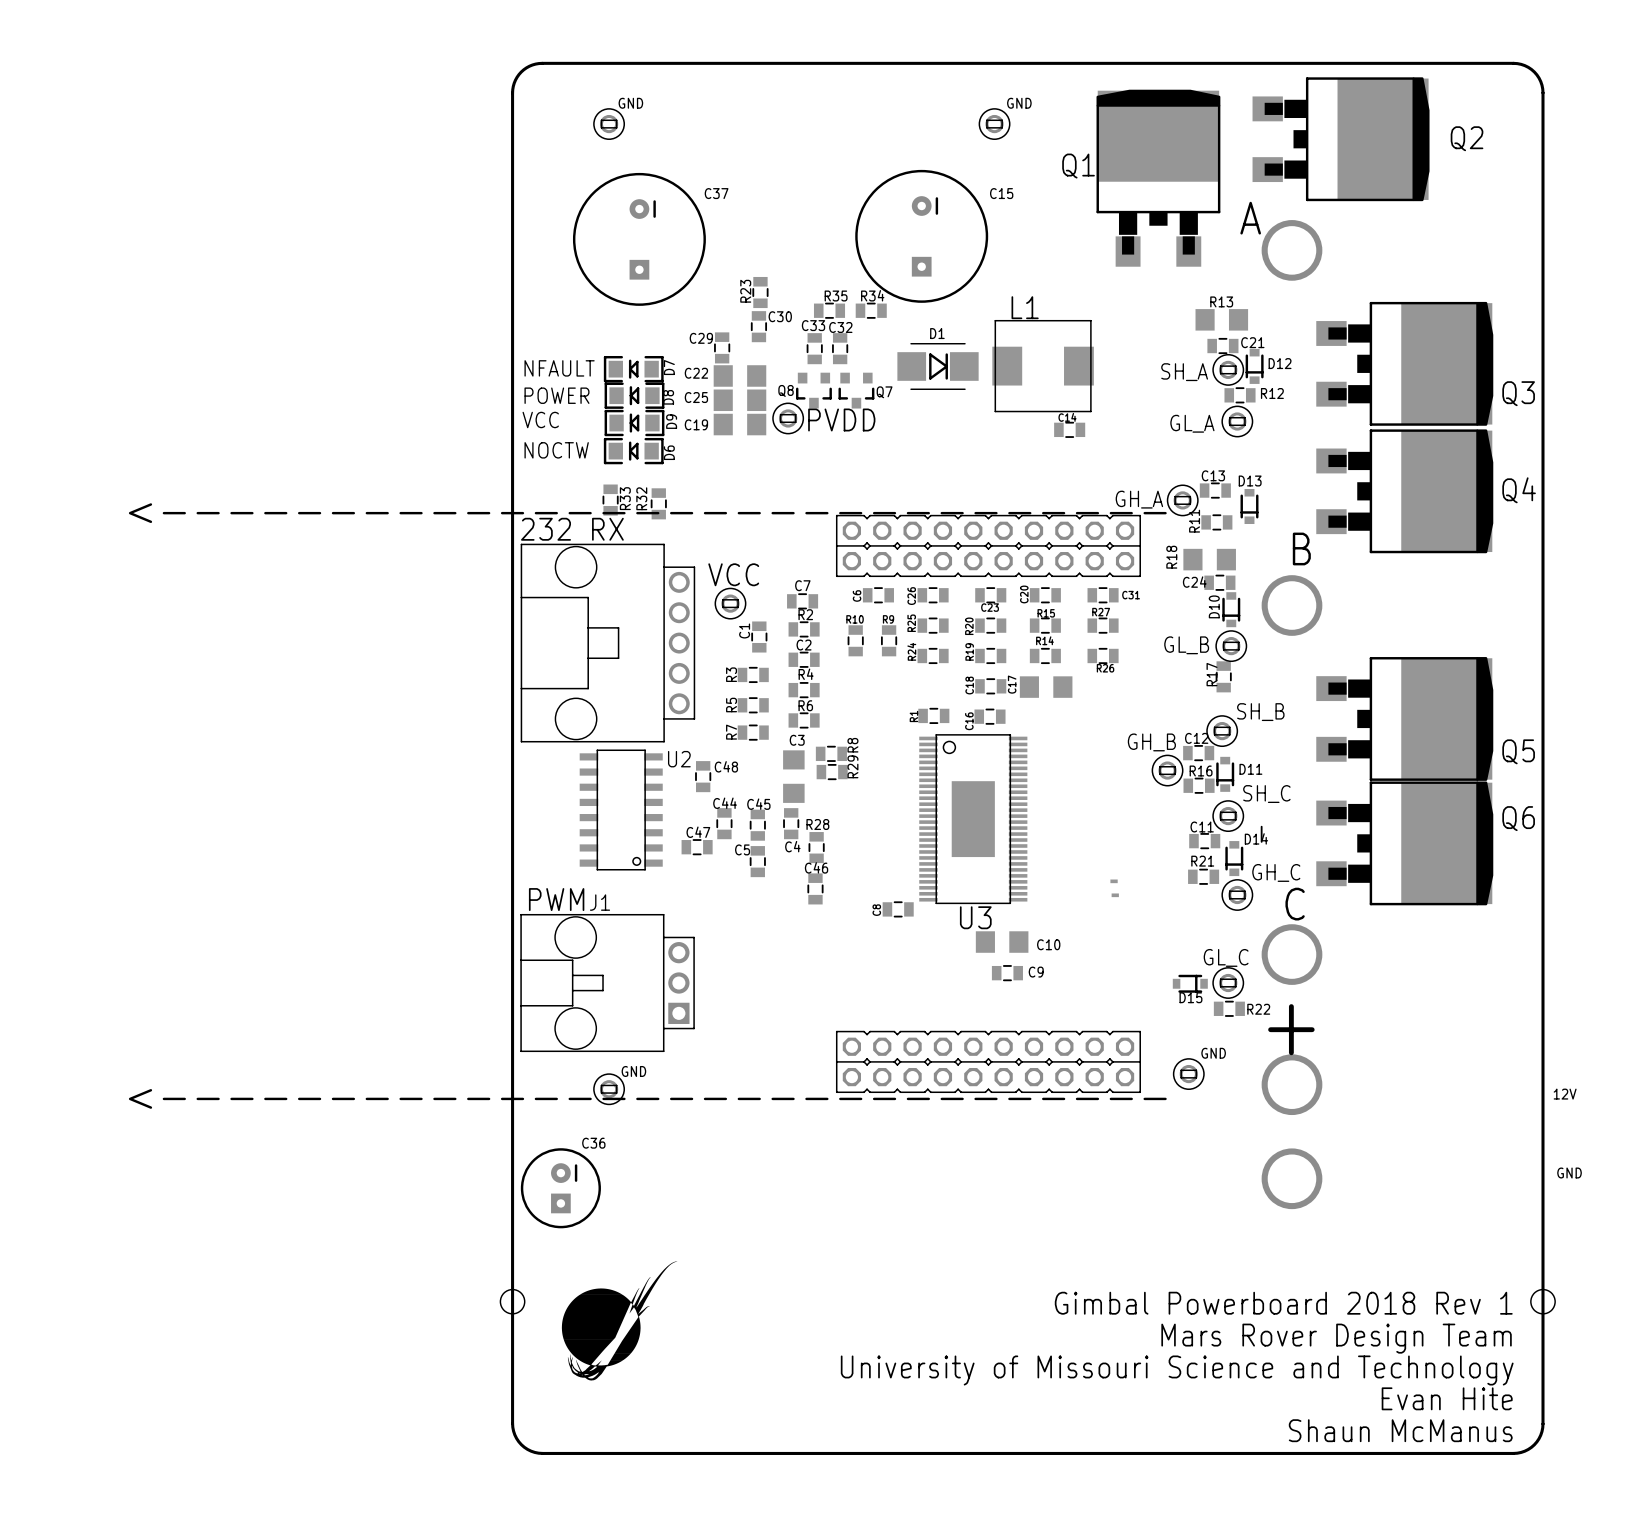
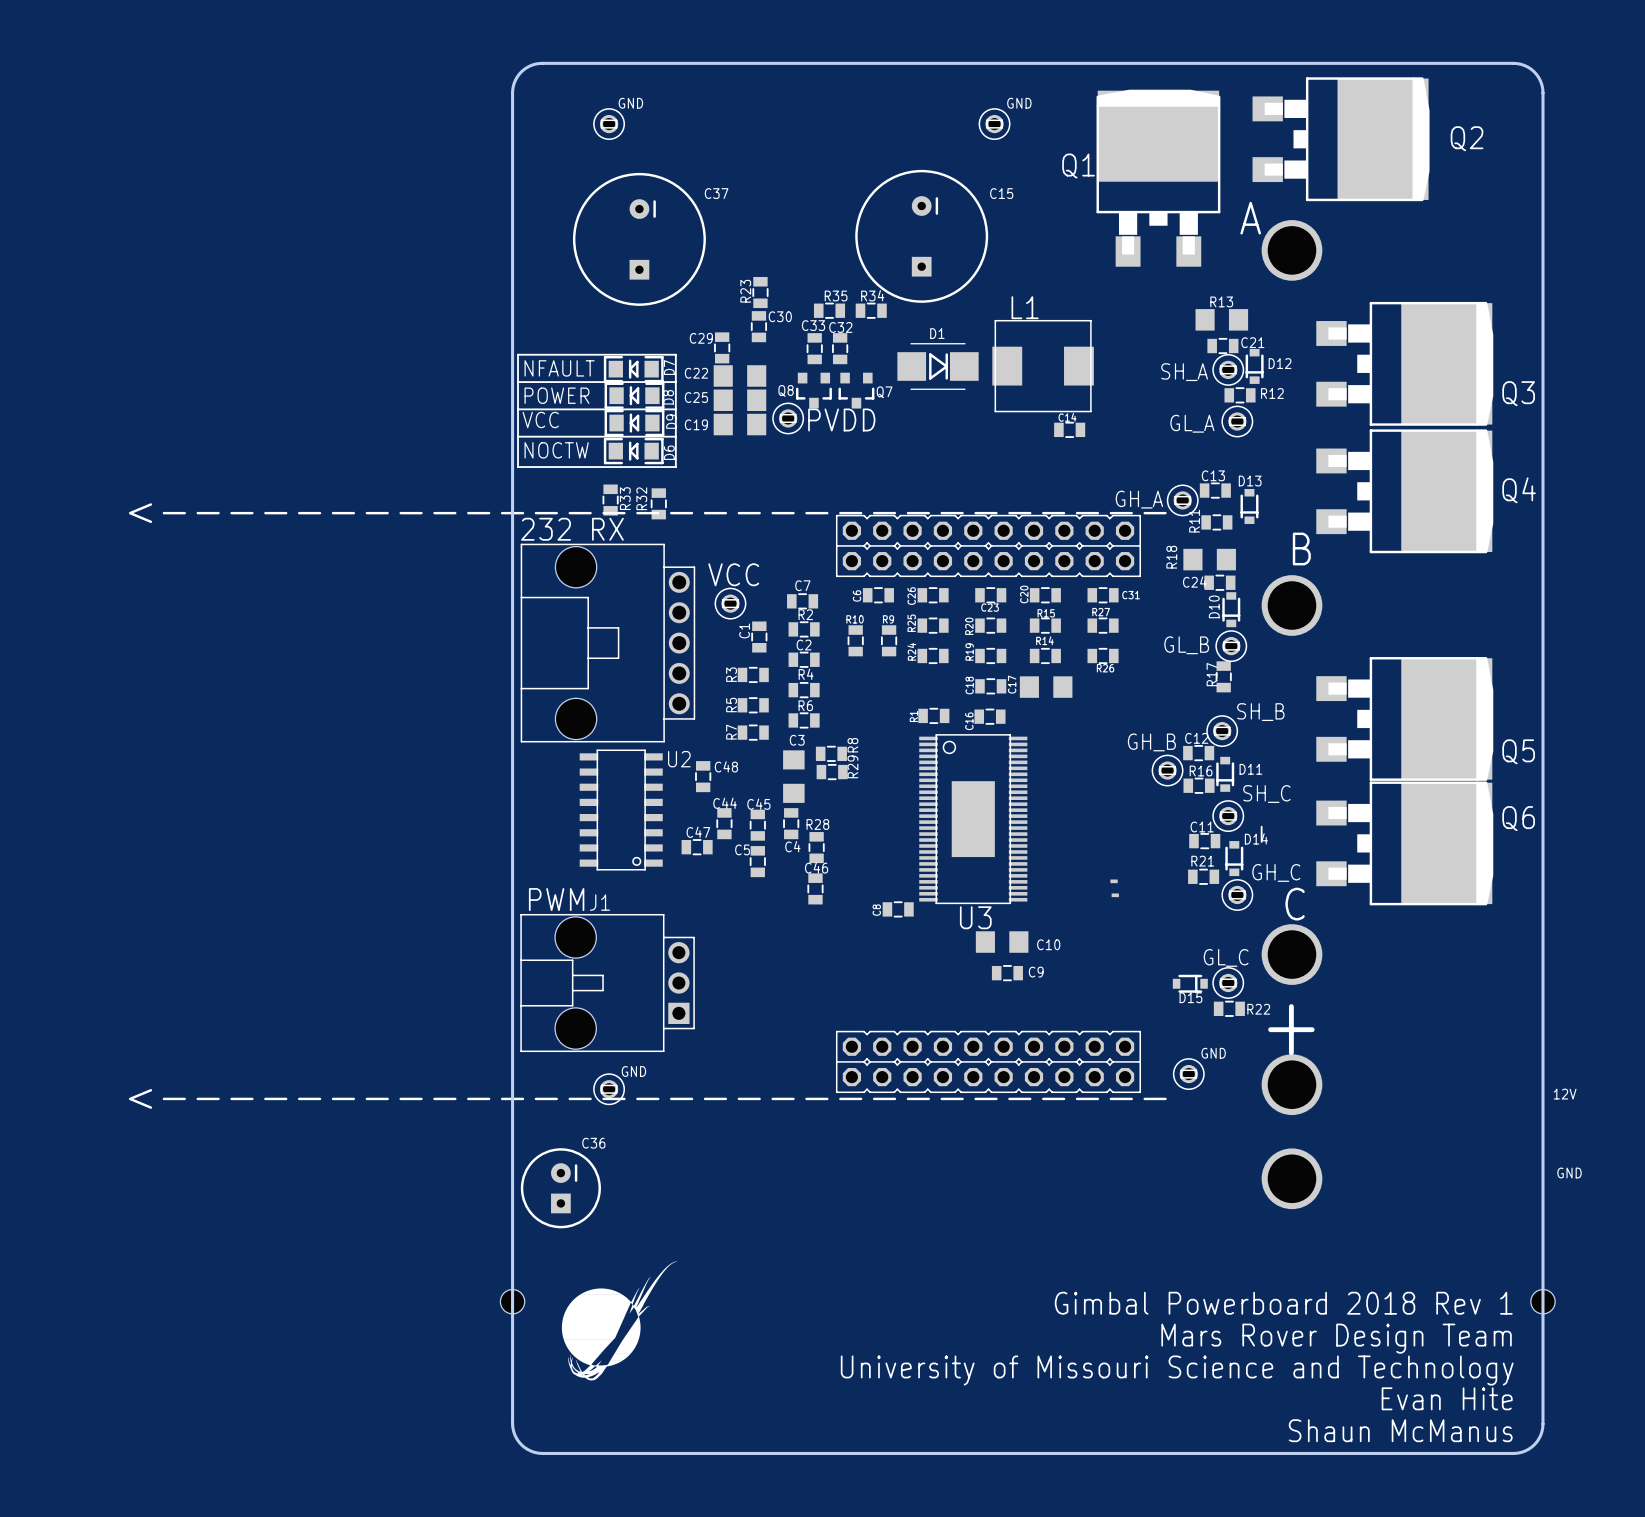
line: none -> (518, 354) (675, 354) (675, 467) (518, 467) (518, 354)
line: none -> (518, 382) (675, 382)
line: none -> (518, 409) (675, 409)
line: none -> (518, 436) (675, 436)

